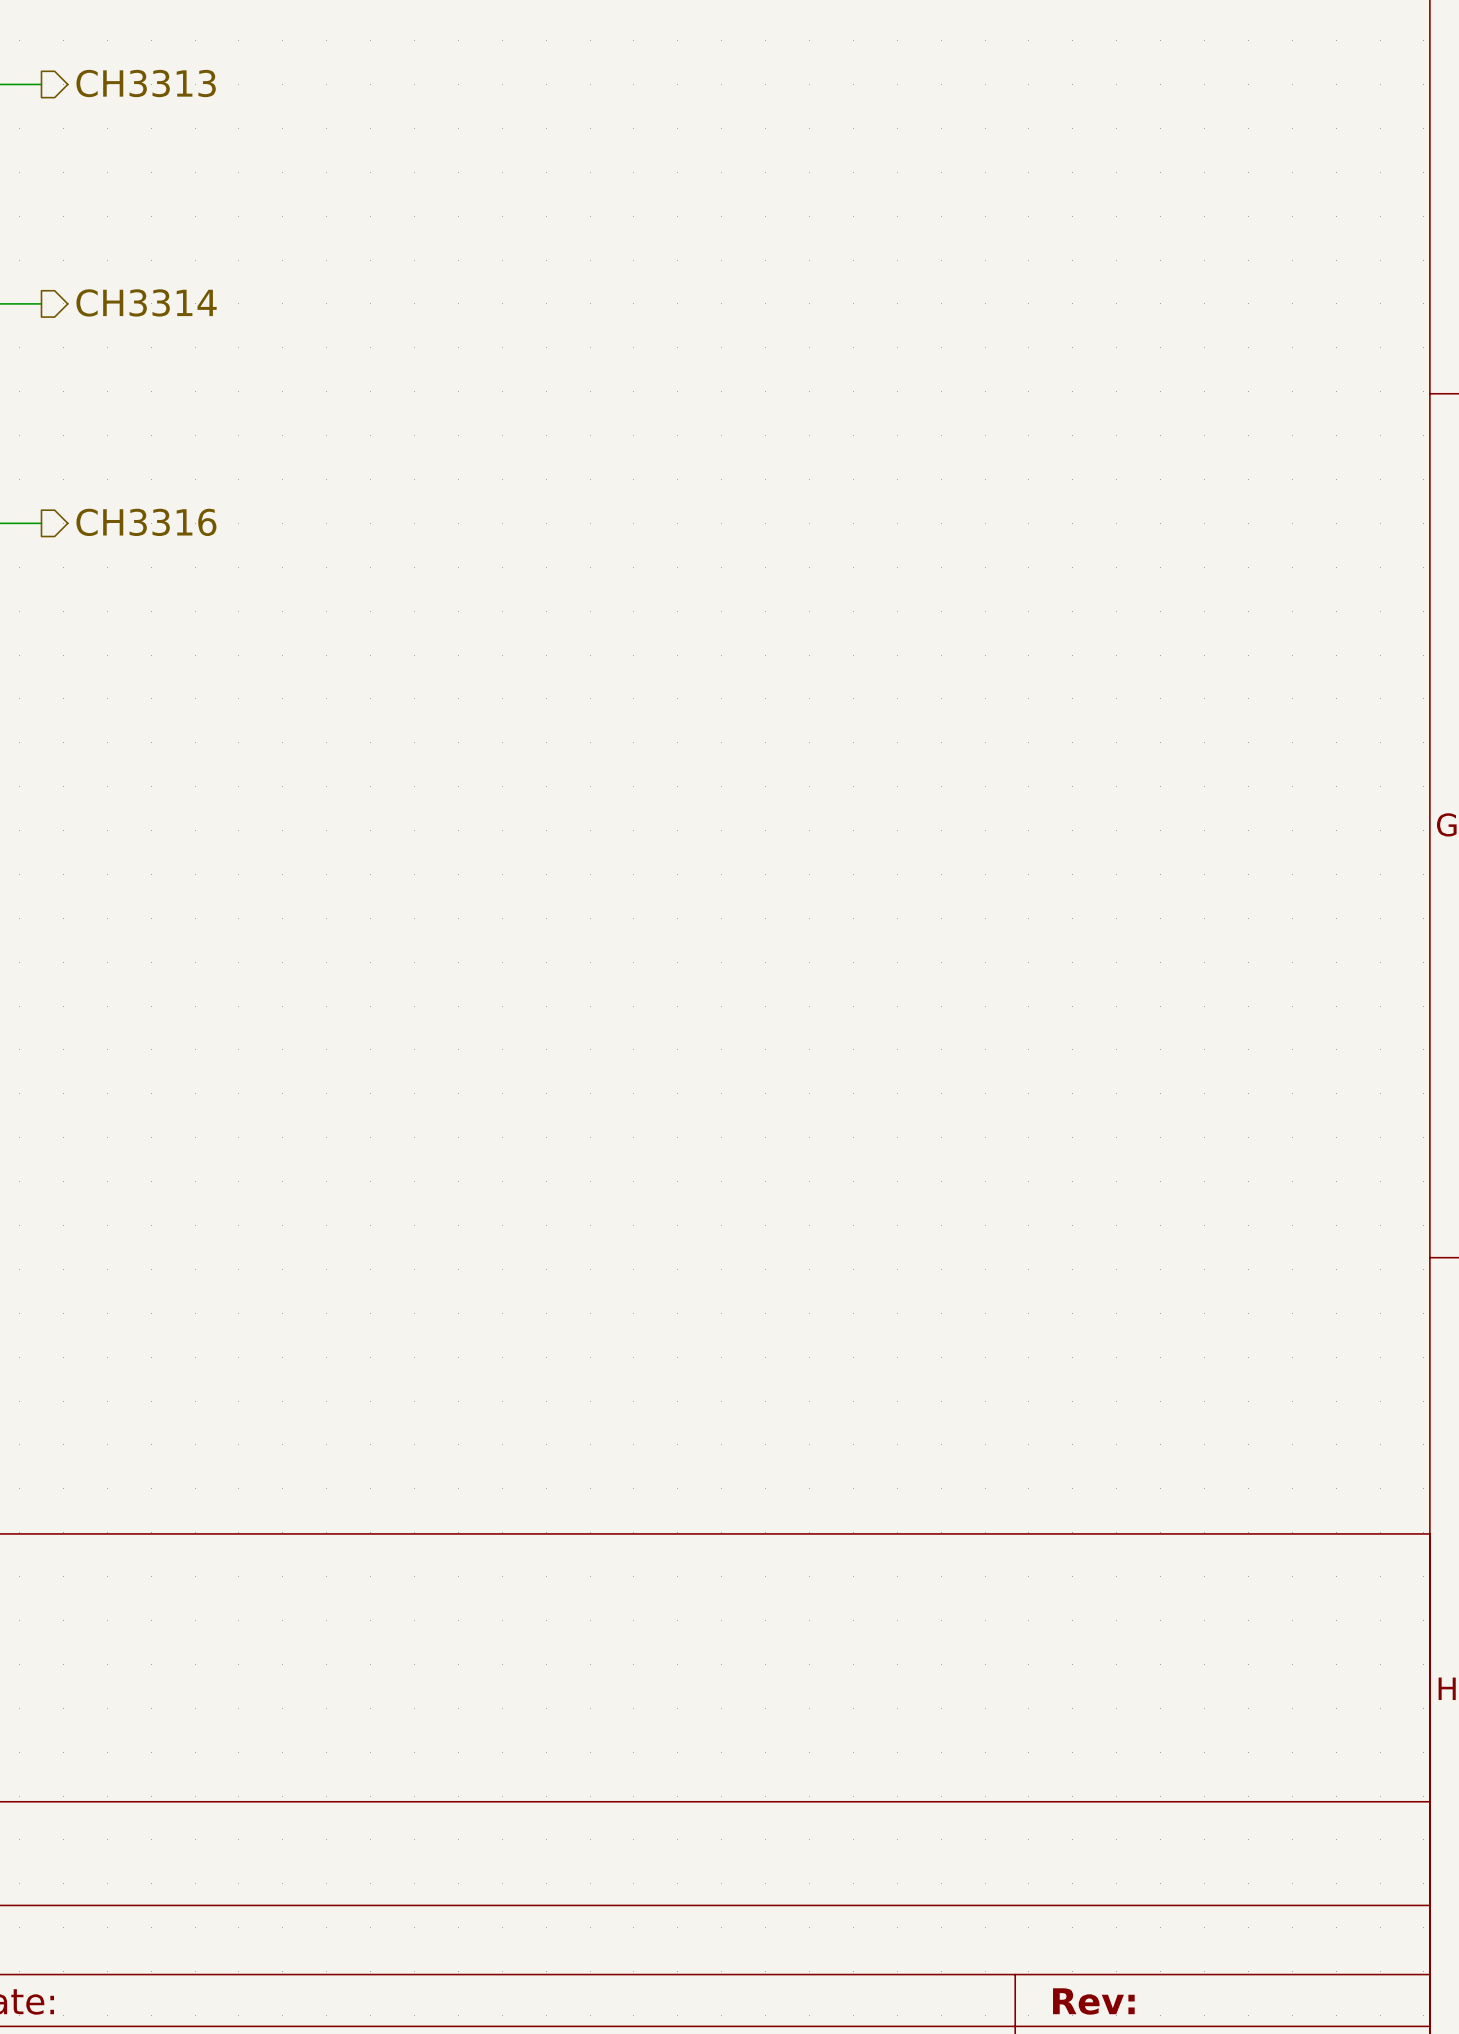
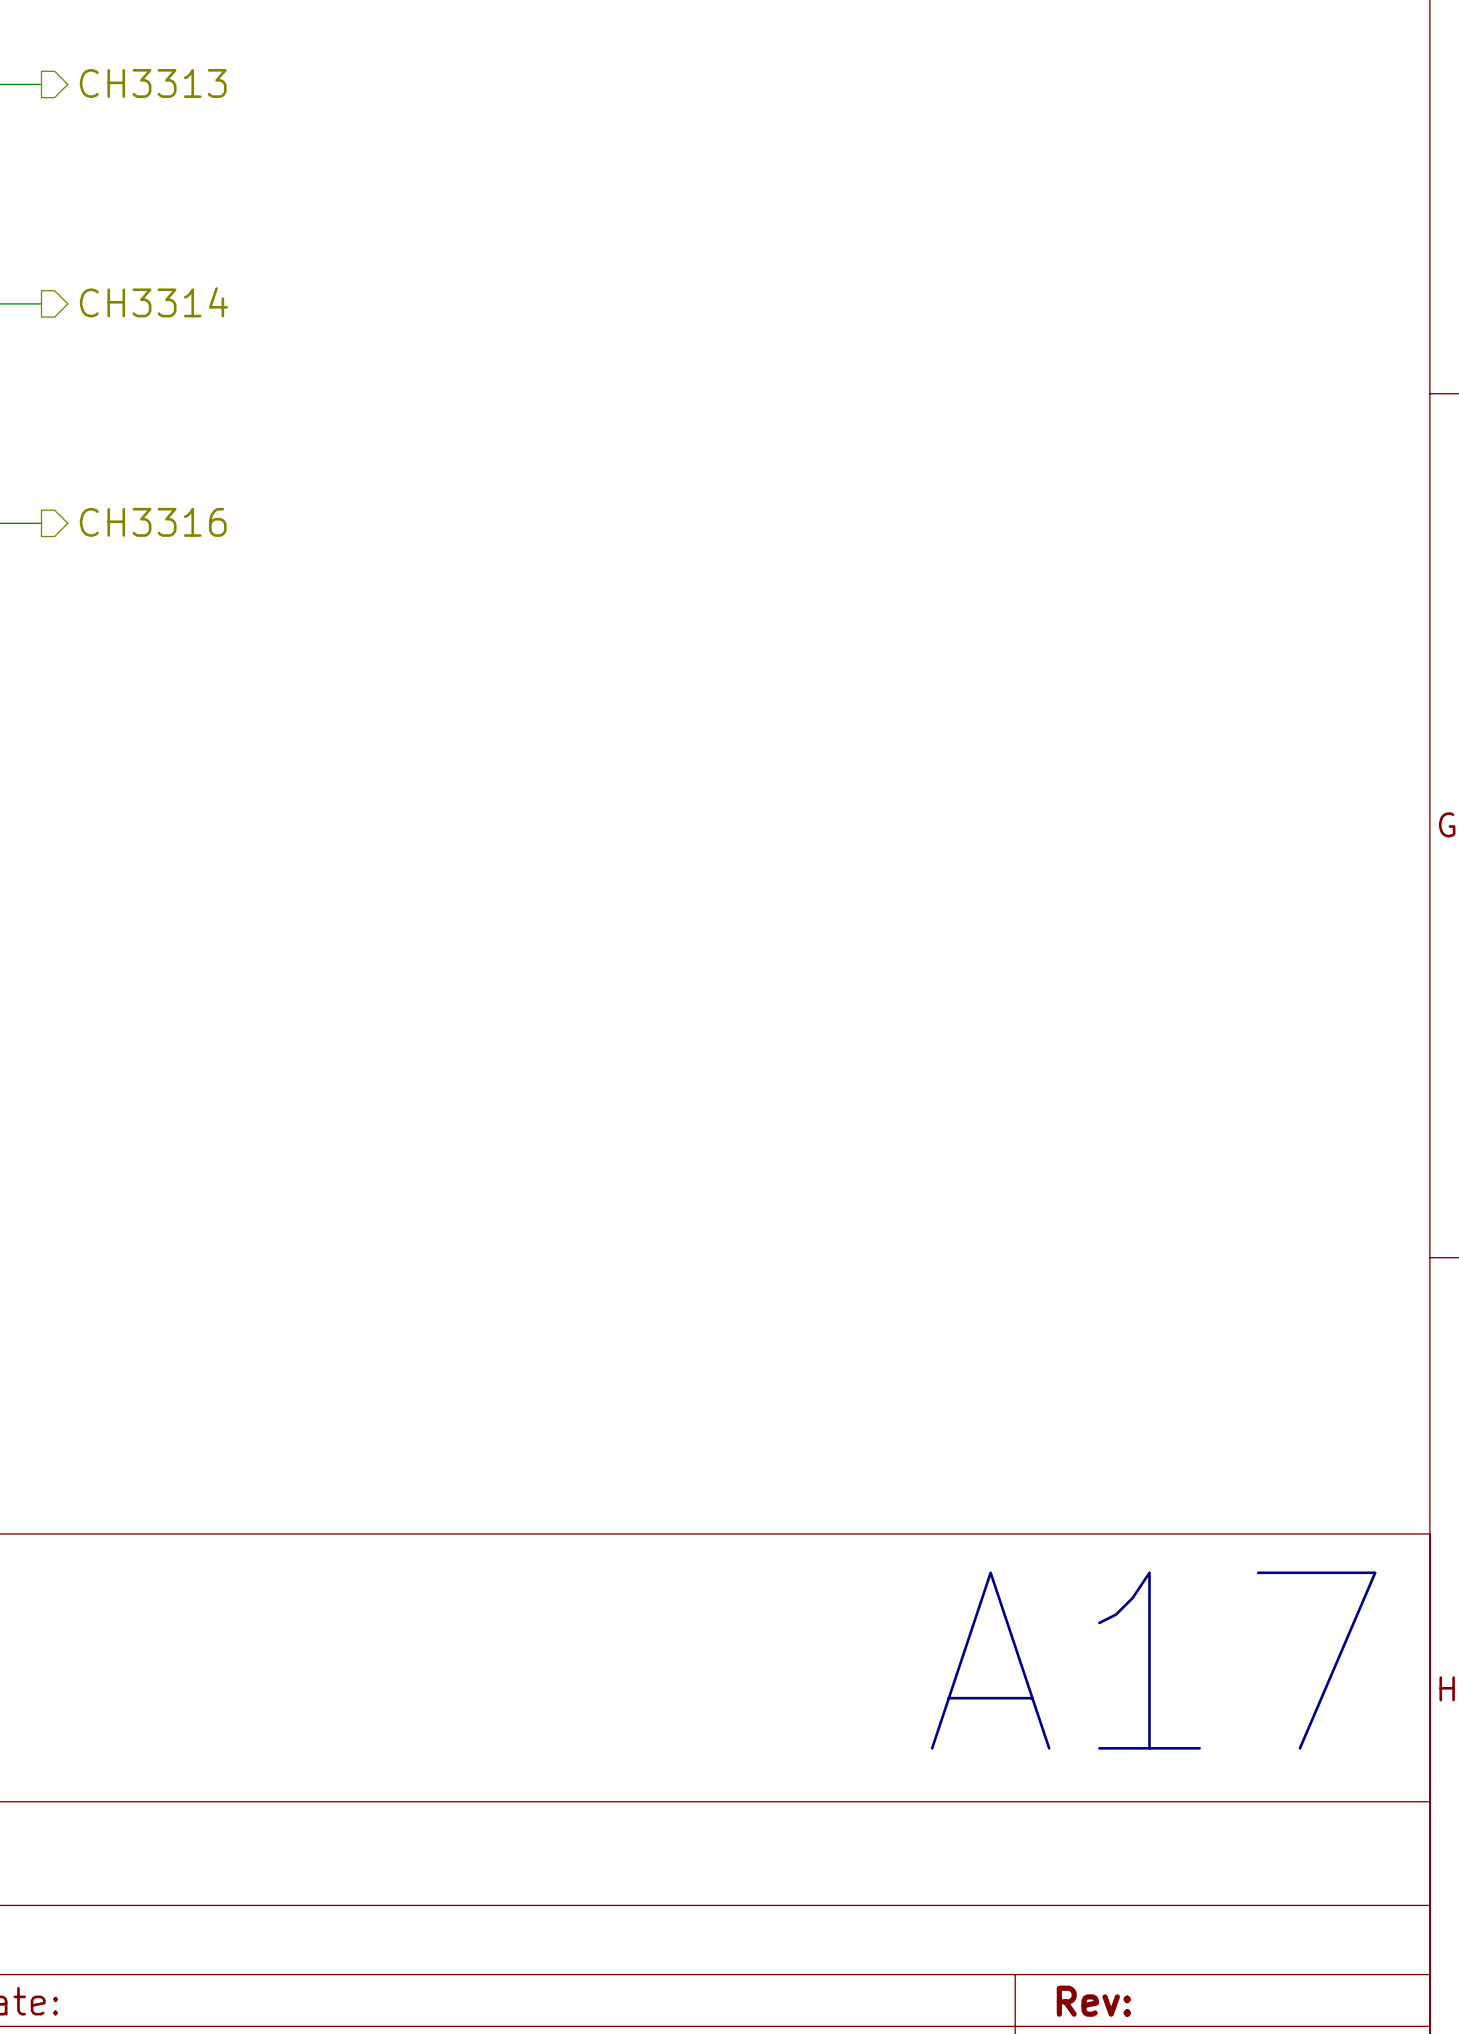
text: none -> A17 (1153, 1660)

